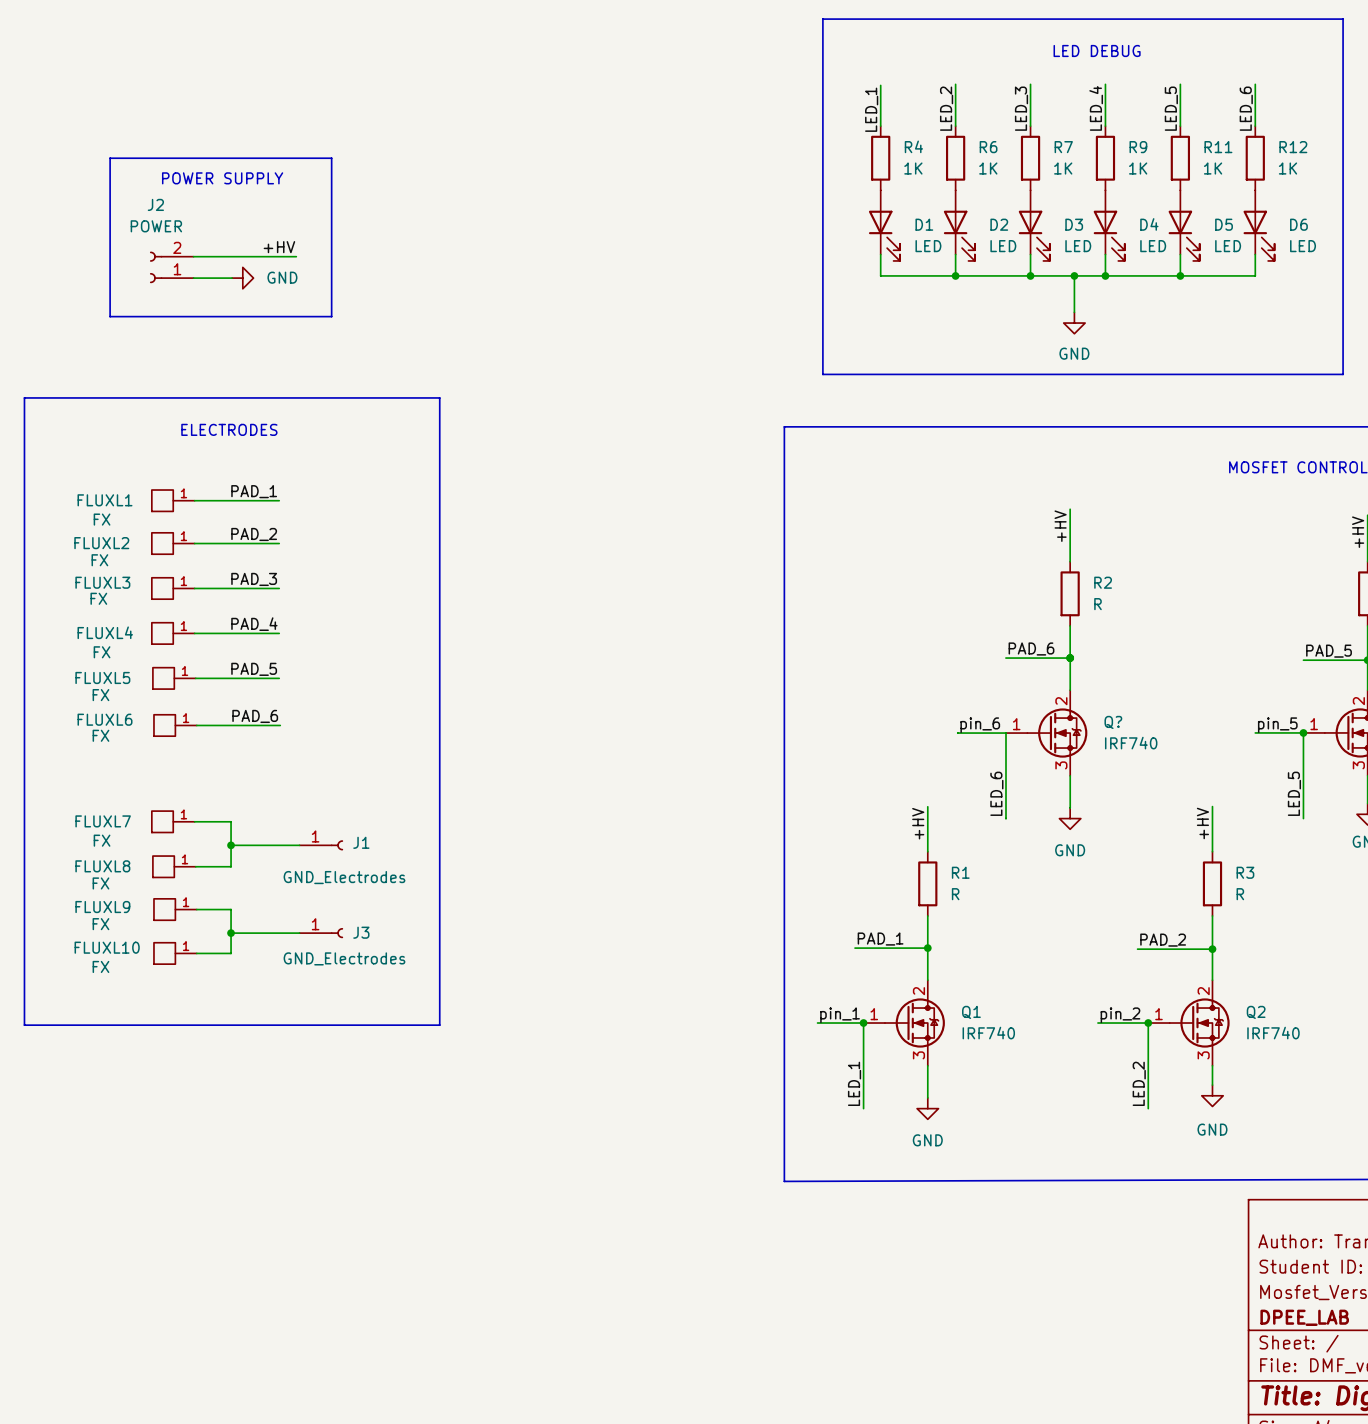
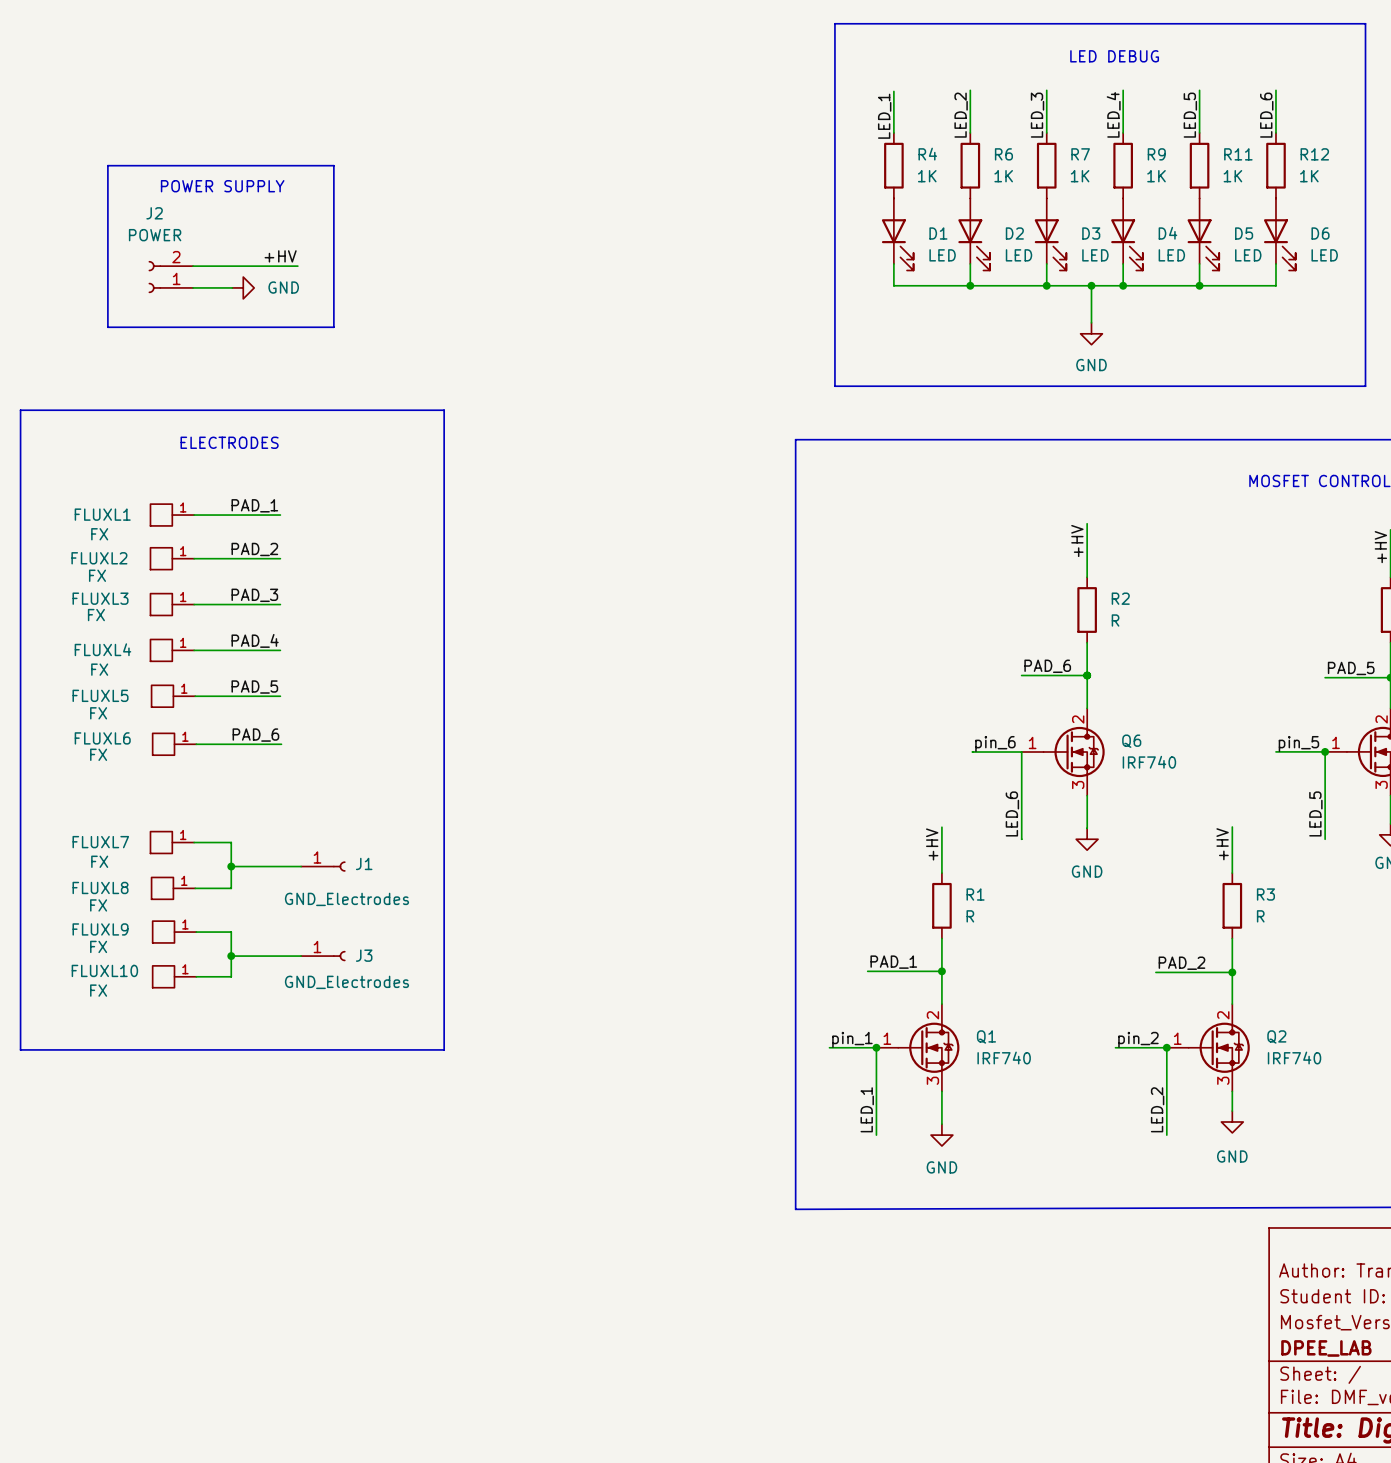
Q? name: Q? (1113, 722) -> Q6 (1131, 741)

